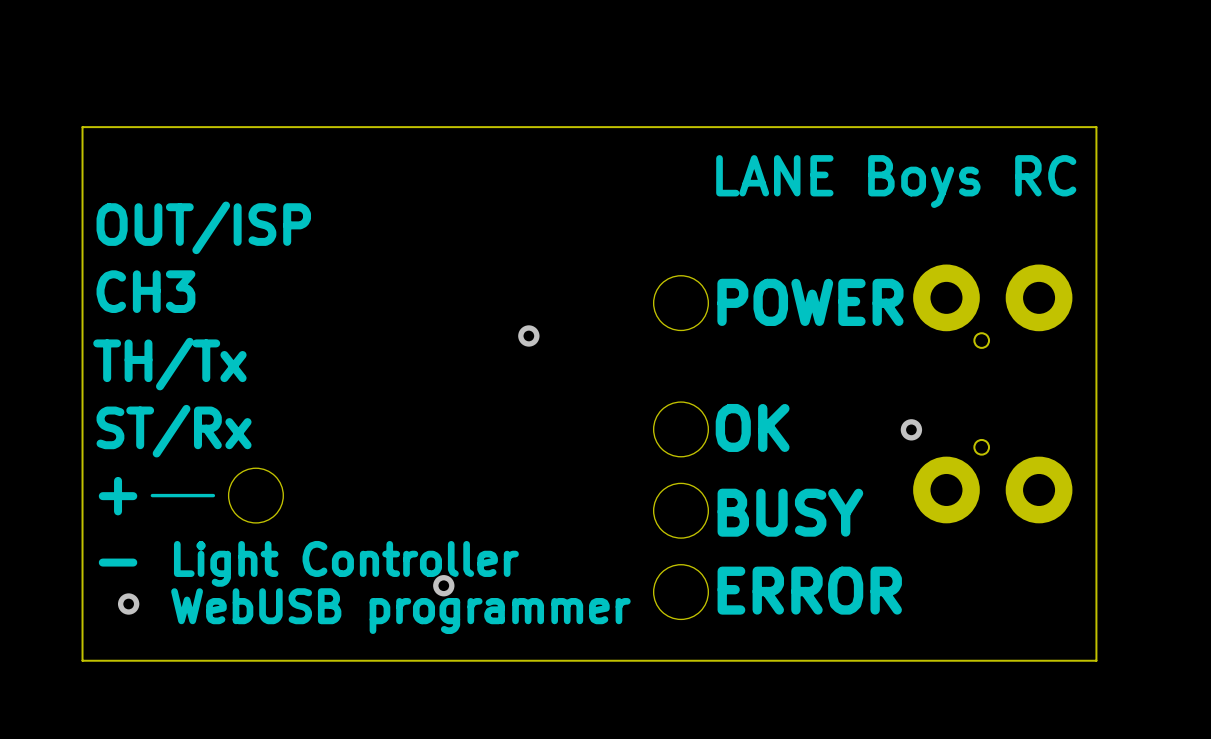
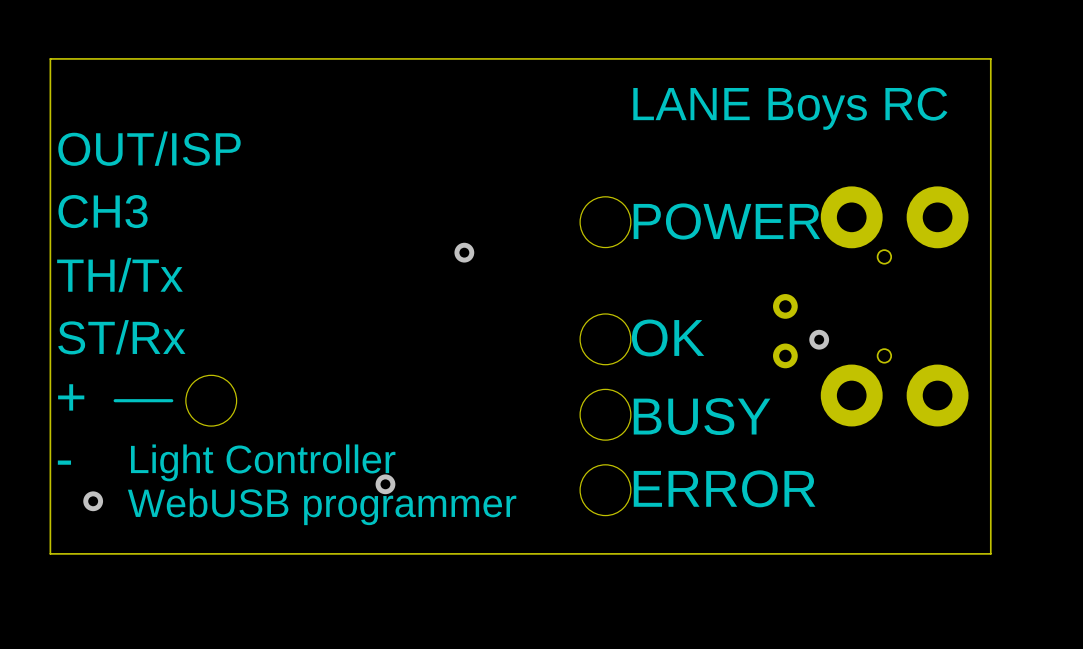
part: none -> (785, 306)
part: none -> (785, 355)

